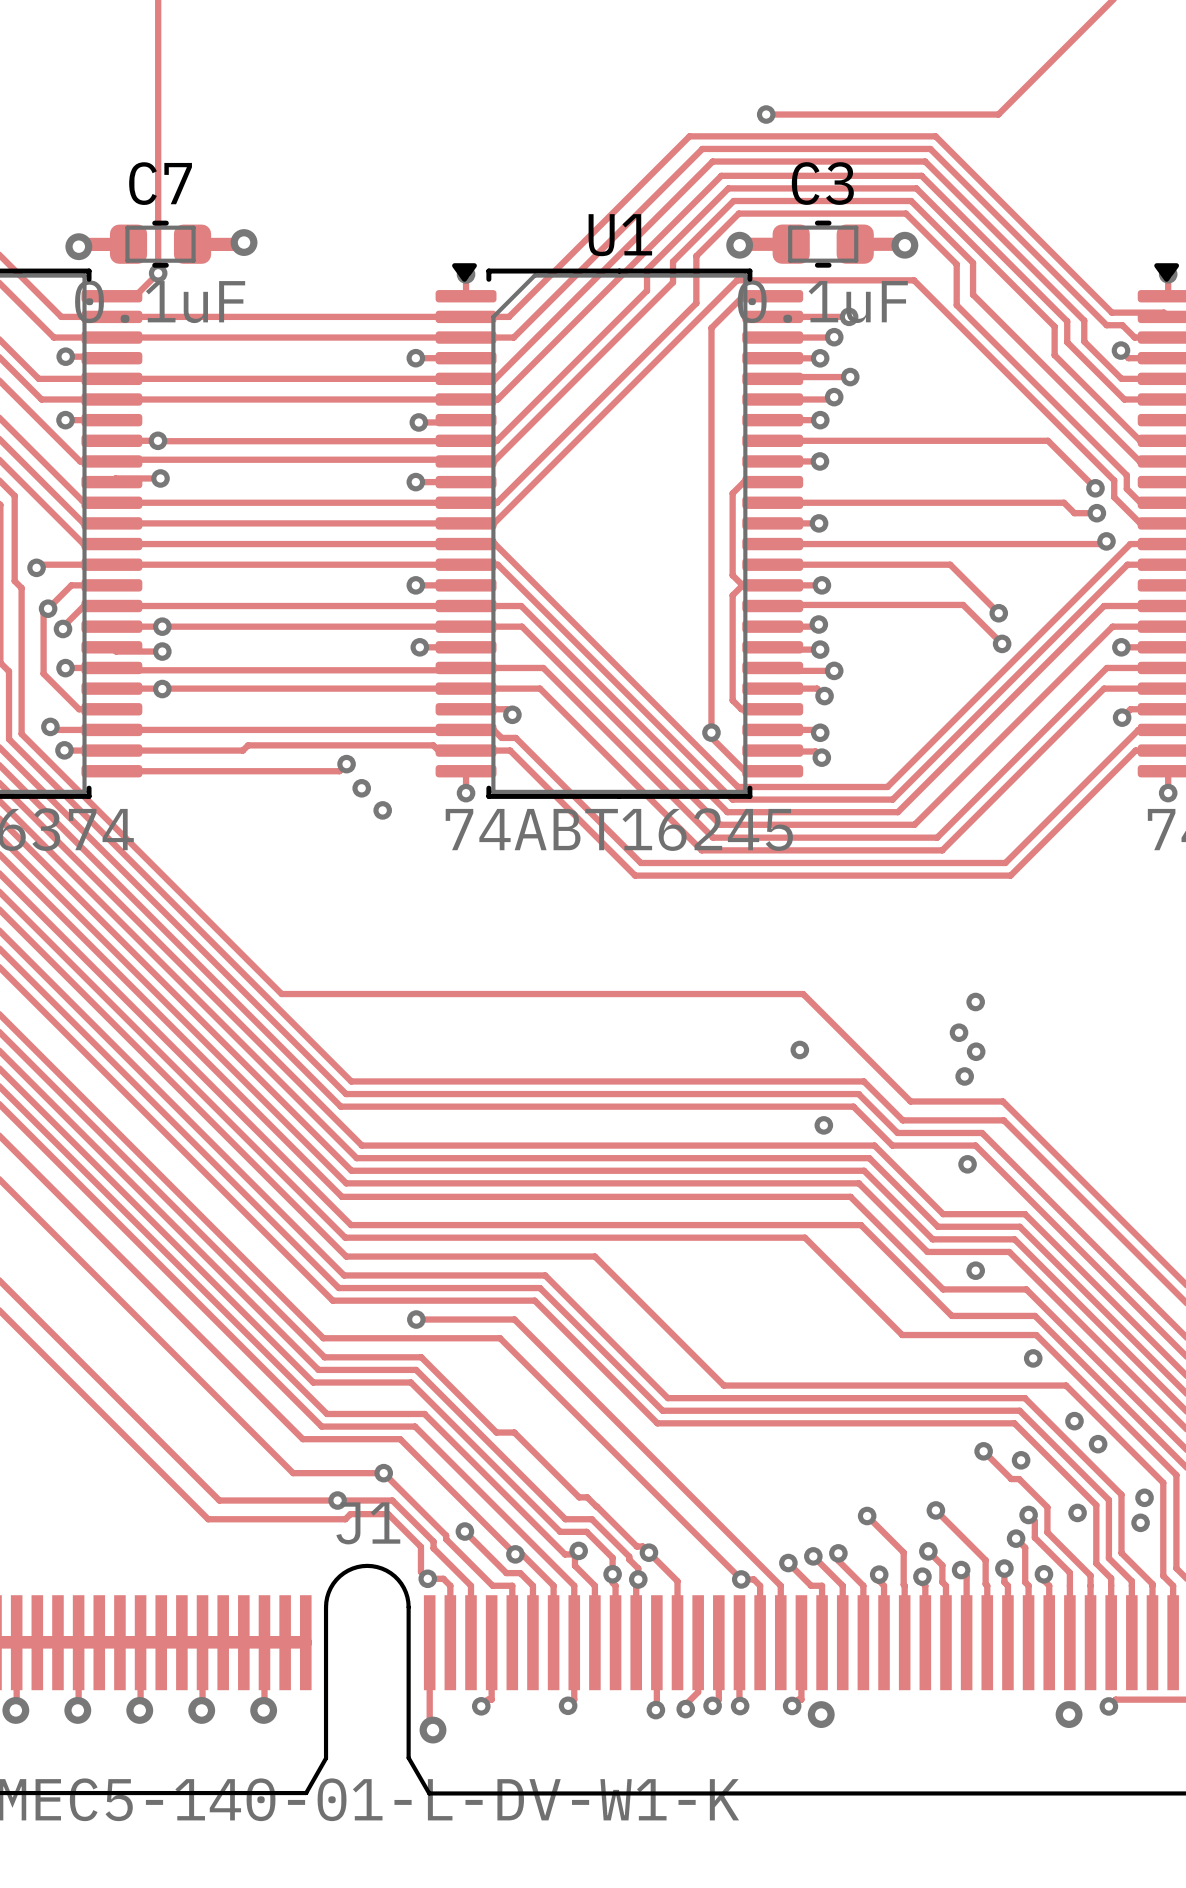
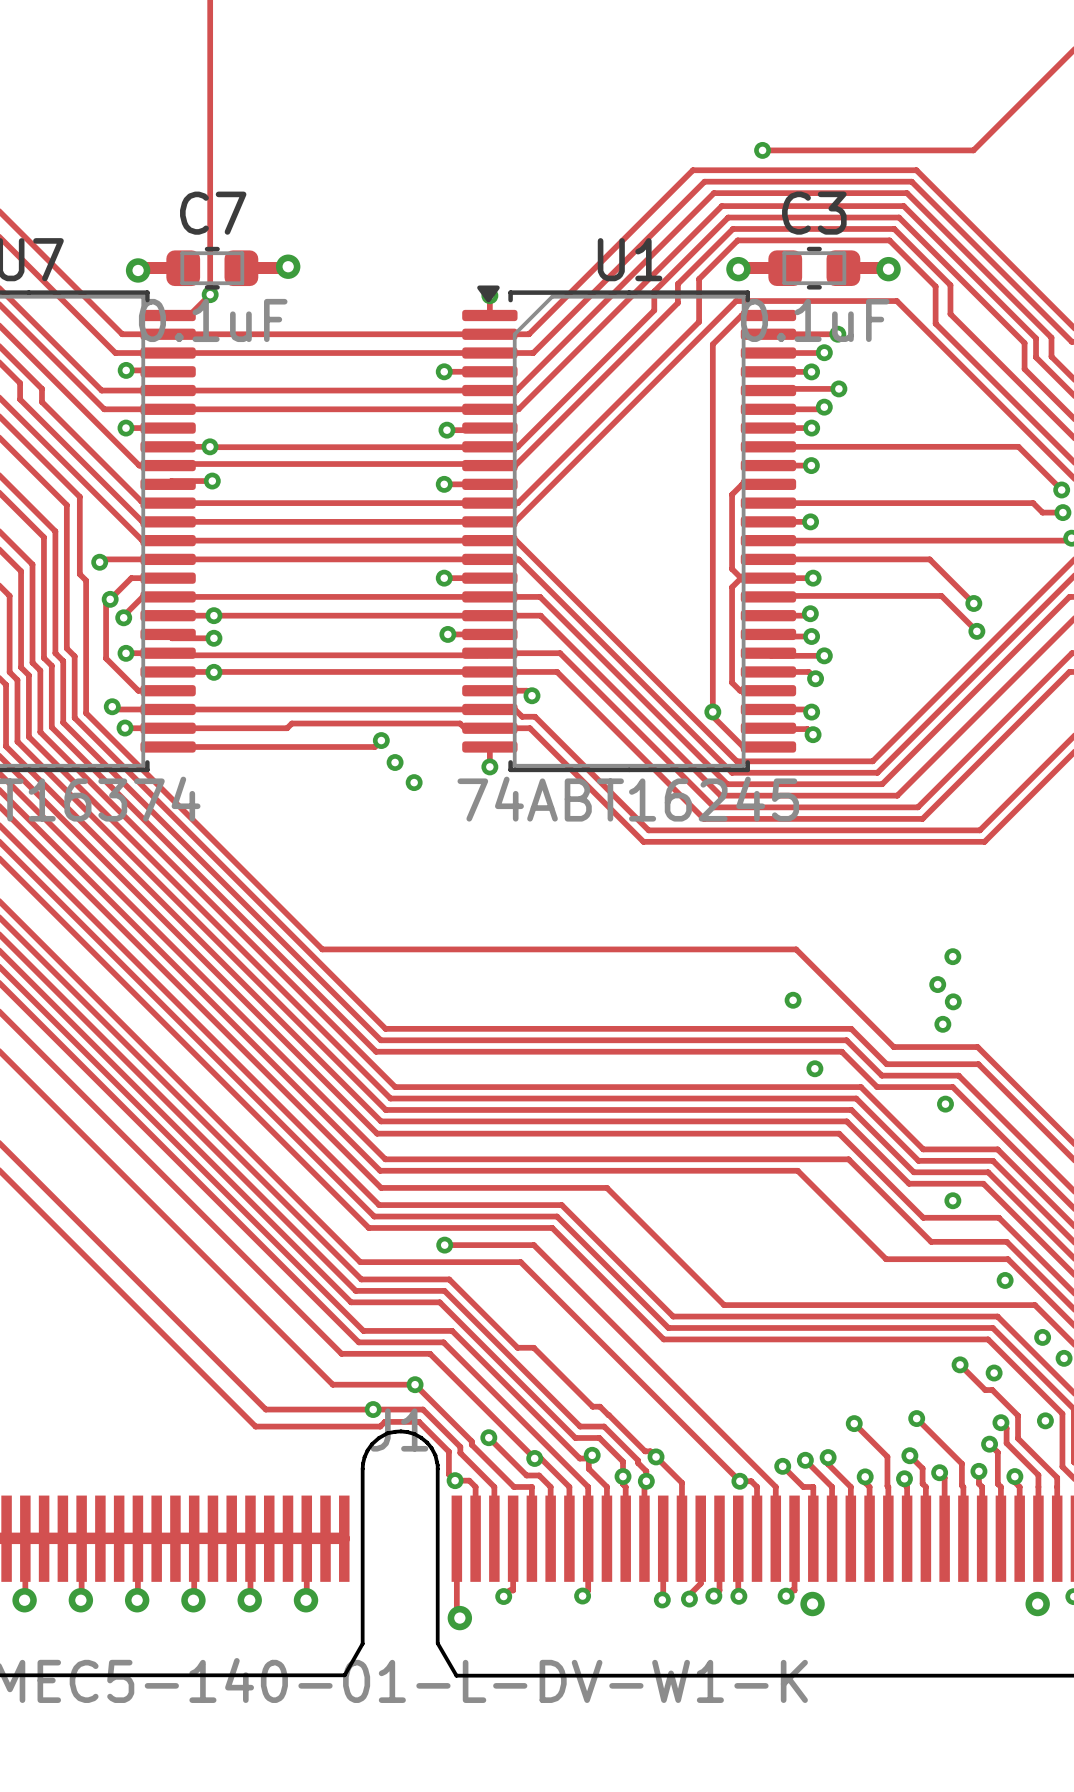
board edge: (326, 1607) (328, 1592) (339, 1576) (352, 1568) (367, 1565) (386, 1570) (398, 1579) (405, 1592) (408, 1607) -> (362, 1506) (363, 1463) (367, 1450) (378, 1438) (387, 1433) (400, 1431) (414, 1434) (421, 1437) (427, 1442) (435, 1455) (437, 1465) (437, 1506)

